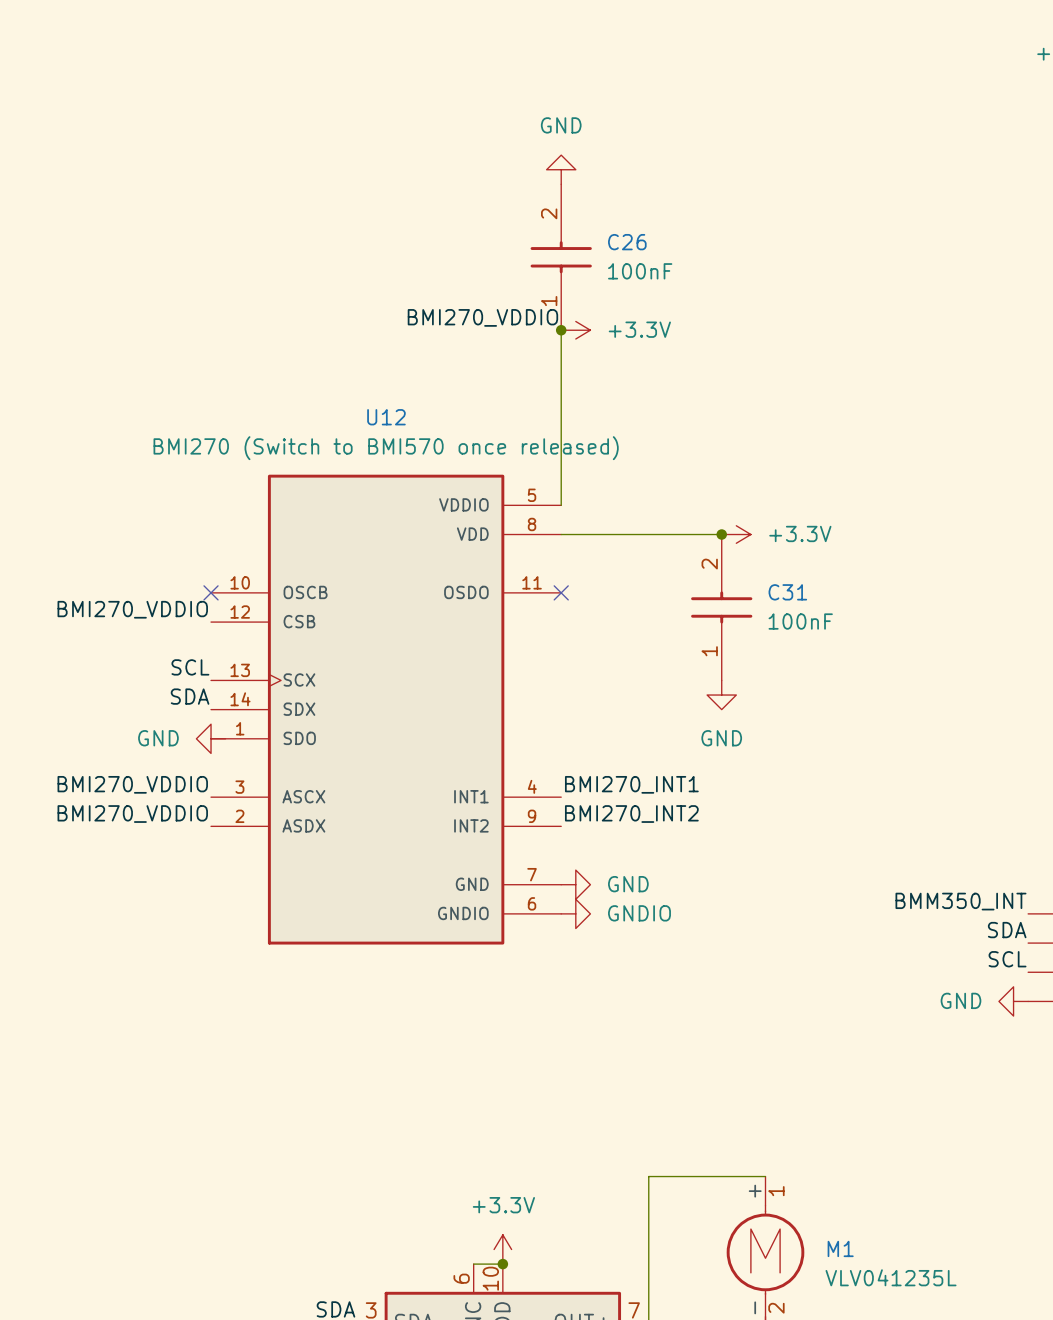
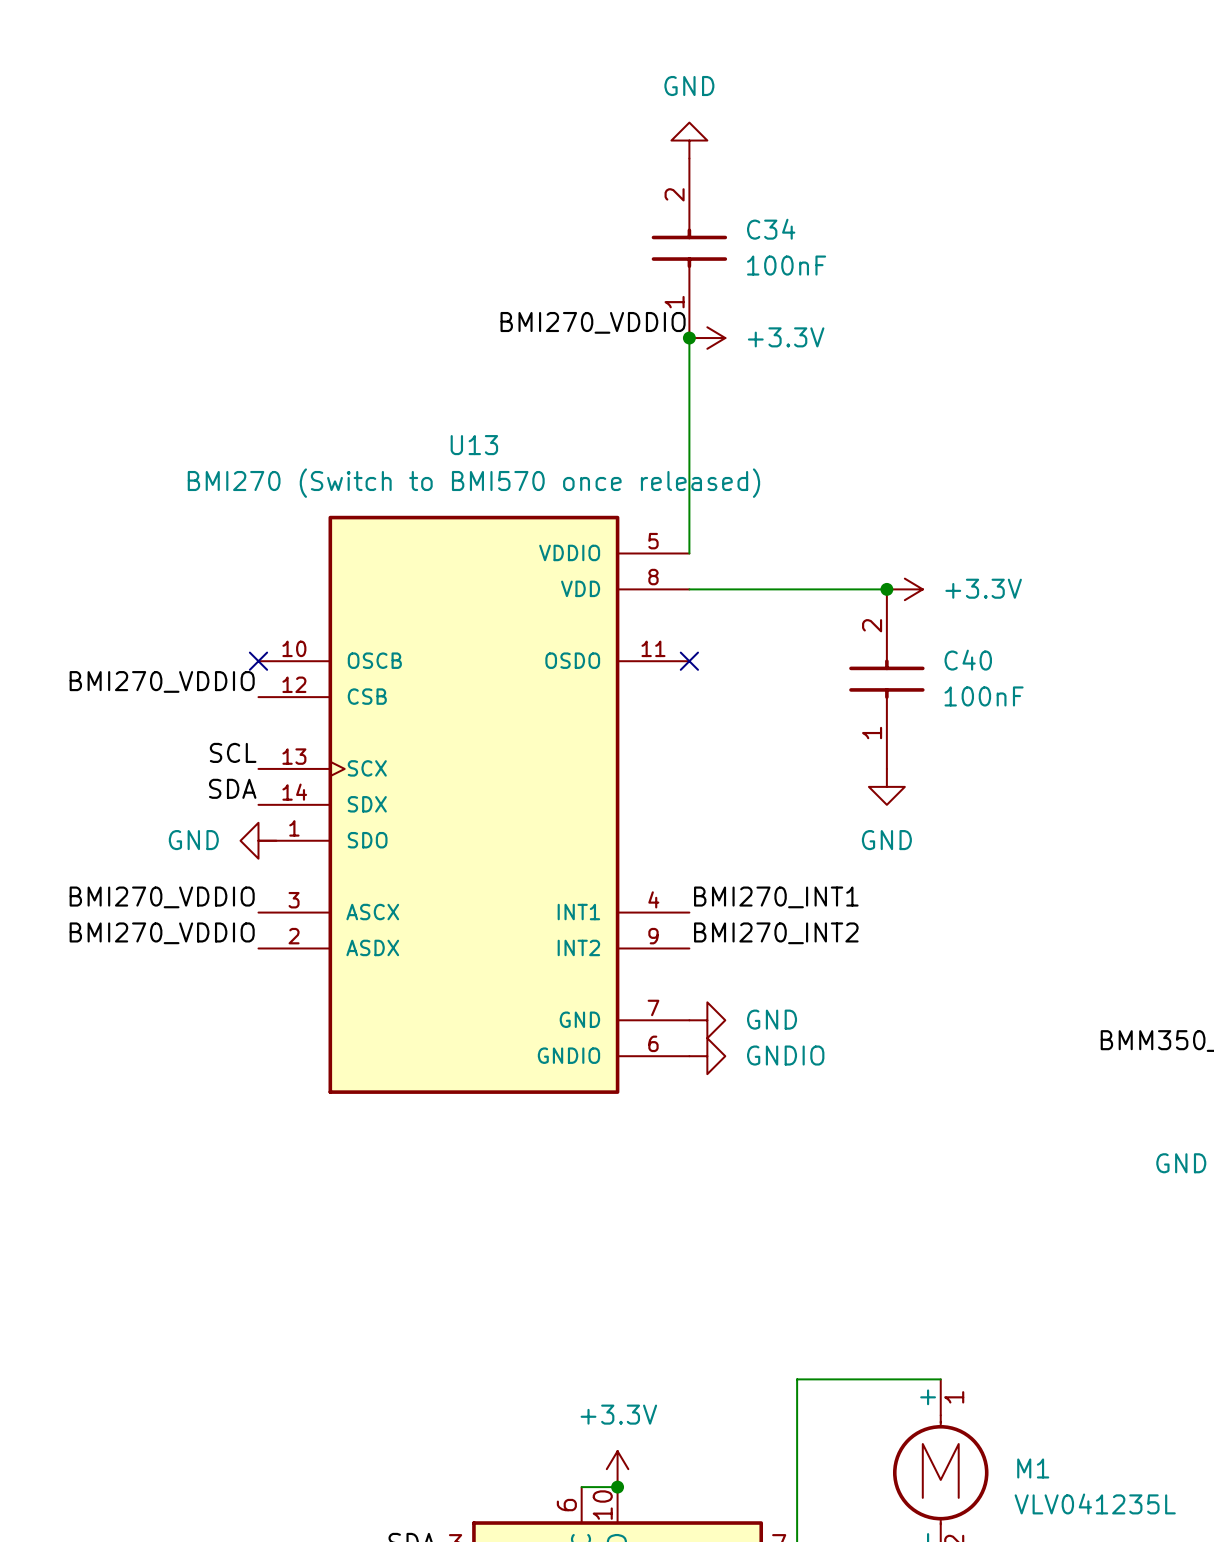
C26 name: C26 (627, 242) -> C34 (771, 229)
U12 name: U12 (386, 417) -> U13 (474, 445)
C31 name: C31 (787, 592) -> C40 (968, 660)

